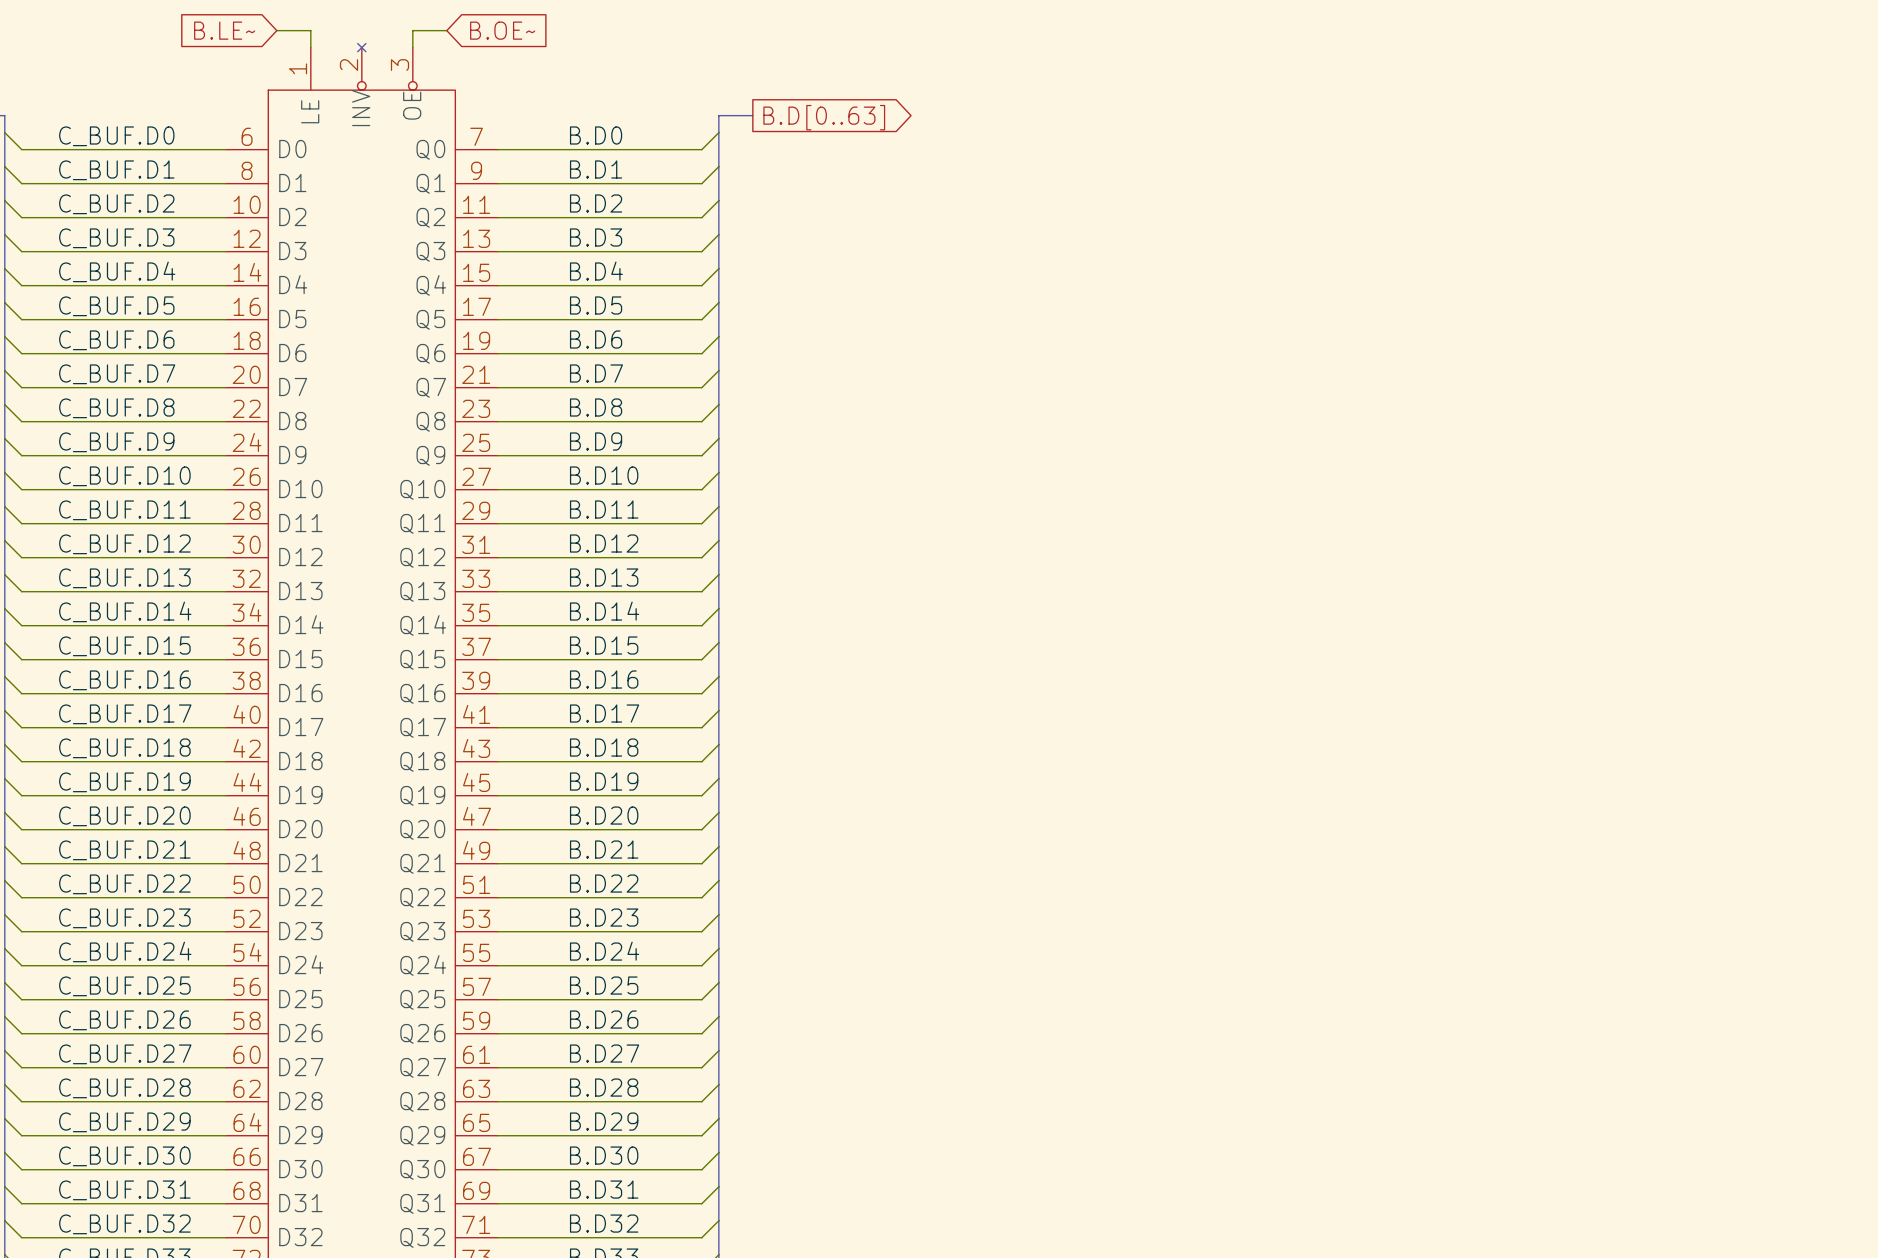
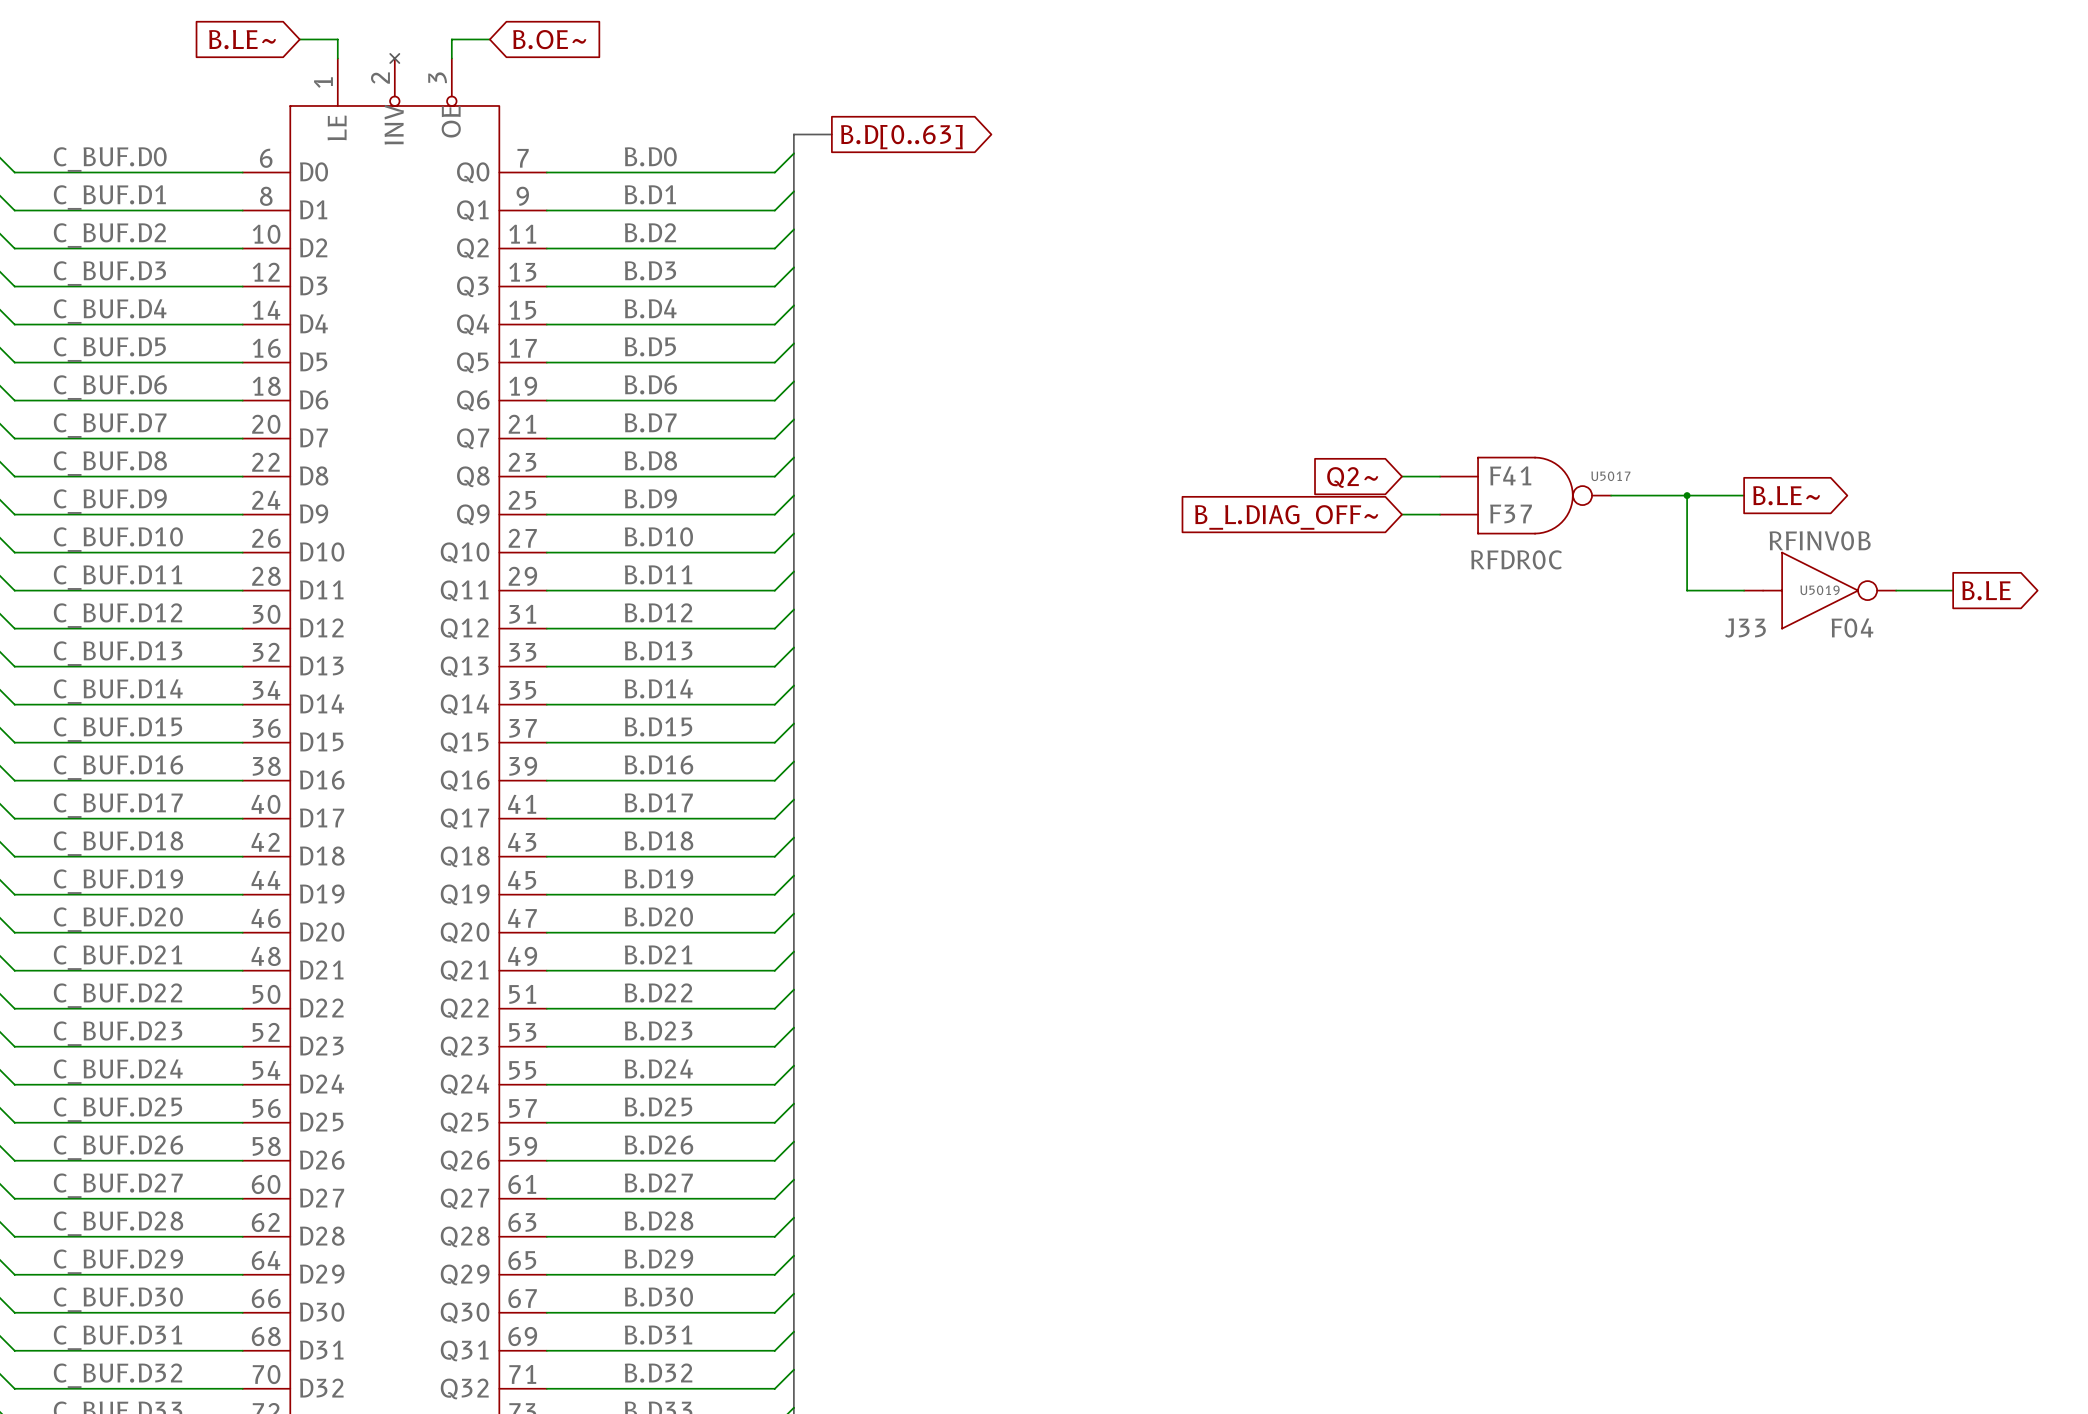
wire: none -> (1402, 476) (1440, 476)
global label: none -> Q2~ (1352, 477)
U5017: none -> F37 (1525, 495)
wire: none -> (1611, 495) (1744, 495)
wire: none -> (1687, 495) (1687, 590) (1744, 590)
junction: none -> (1687, 495)
global label: none -> B.LE~ (1786, 495)
wire: none -> (1402, 514) (1440, 514)
global label: none -> B_L.DIAG_OFF~ (1286, 517)
U5019: none -> F04 (1820, 590)
wire: none -> (1896, 590) (1953, 590)
global label: none -> B.LE (1986, 590)

